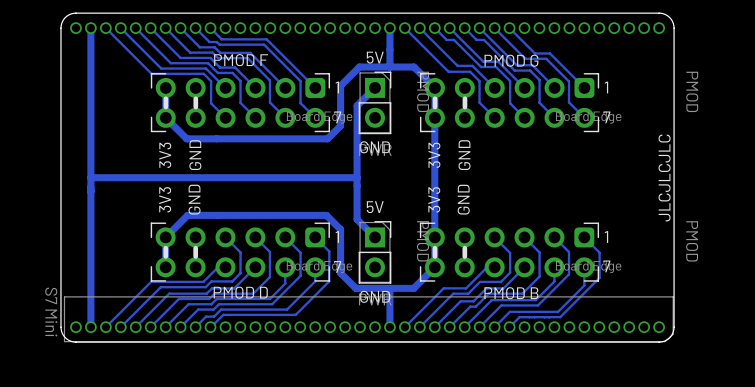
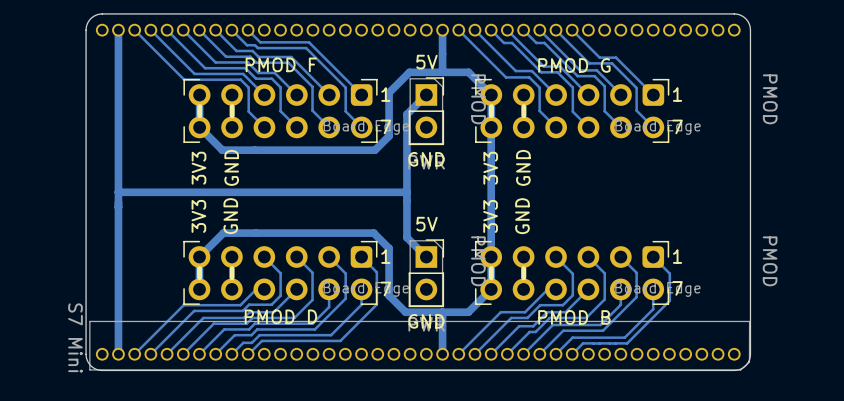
text: JLCJLCJLC (664, 178) -> none

